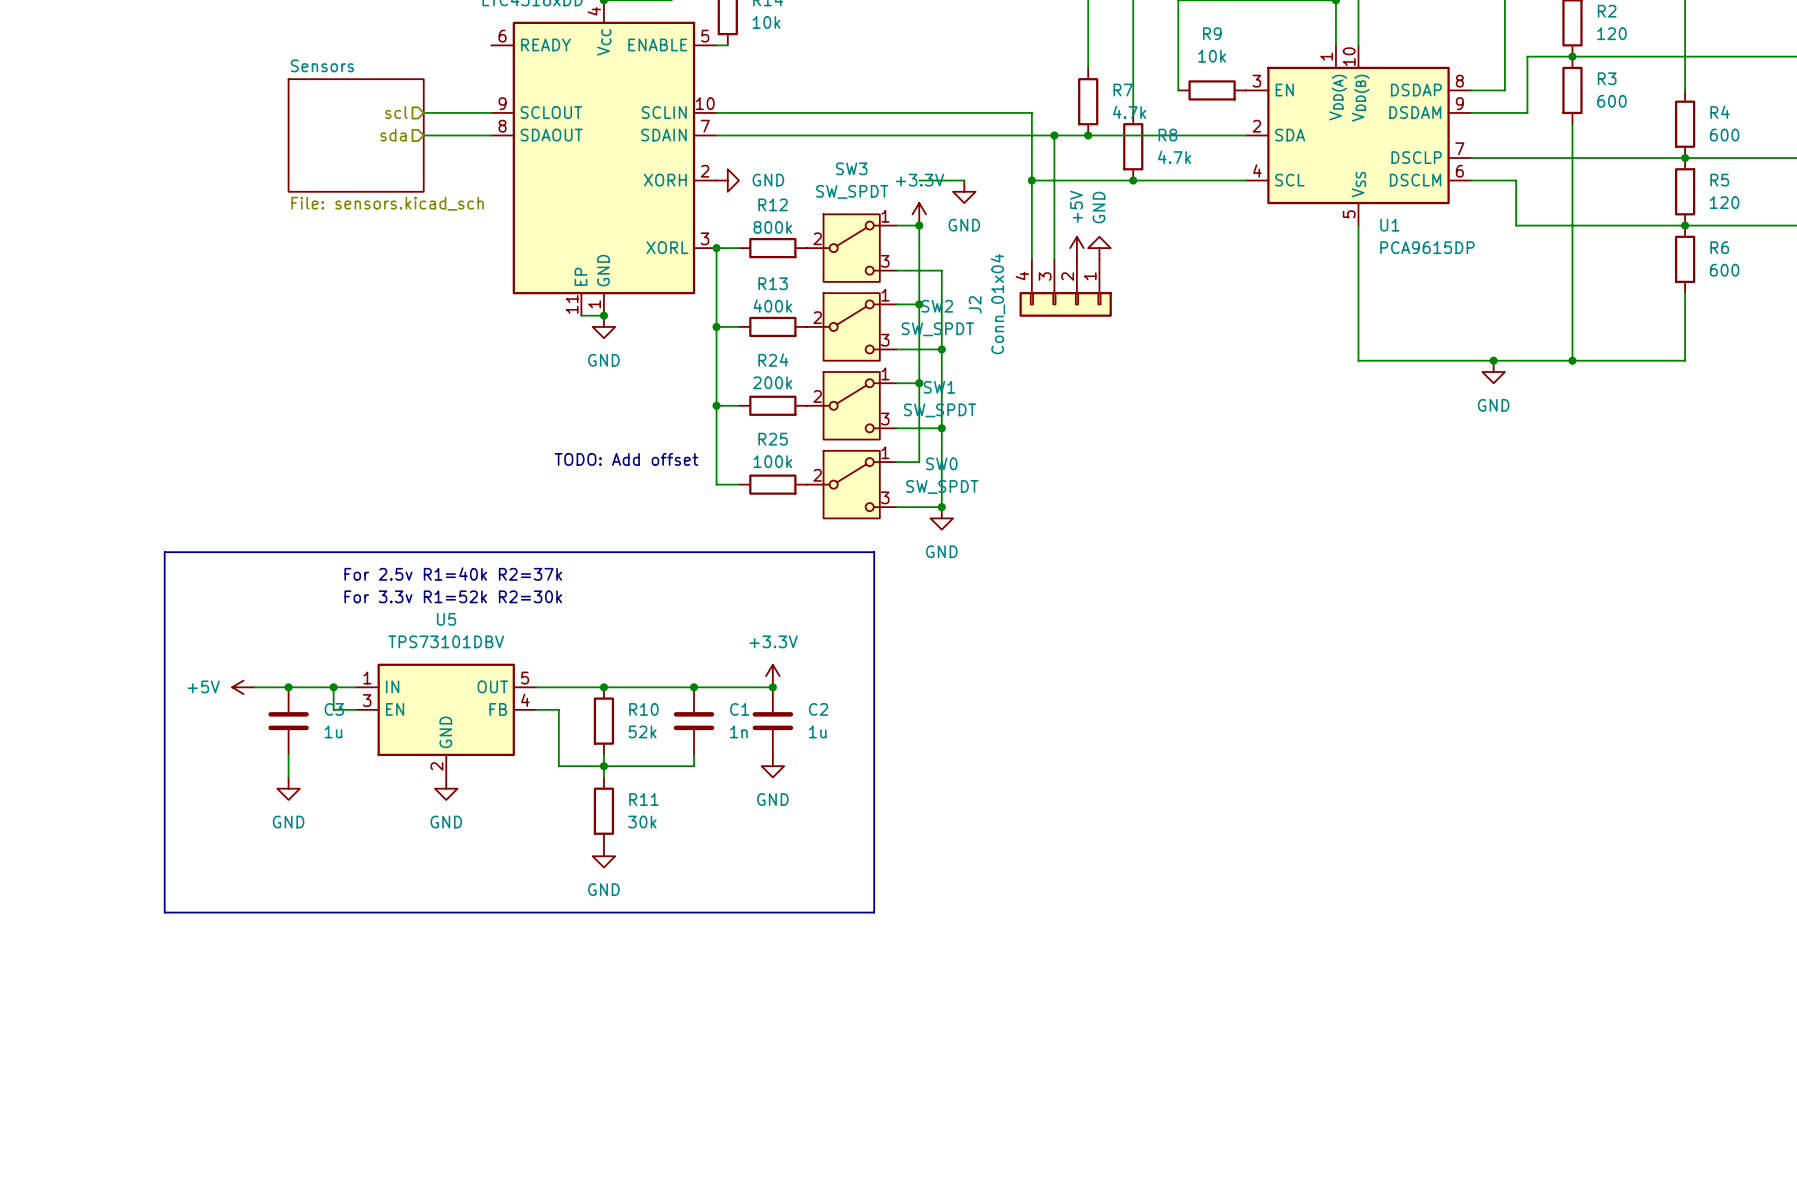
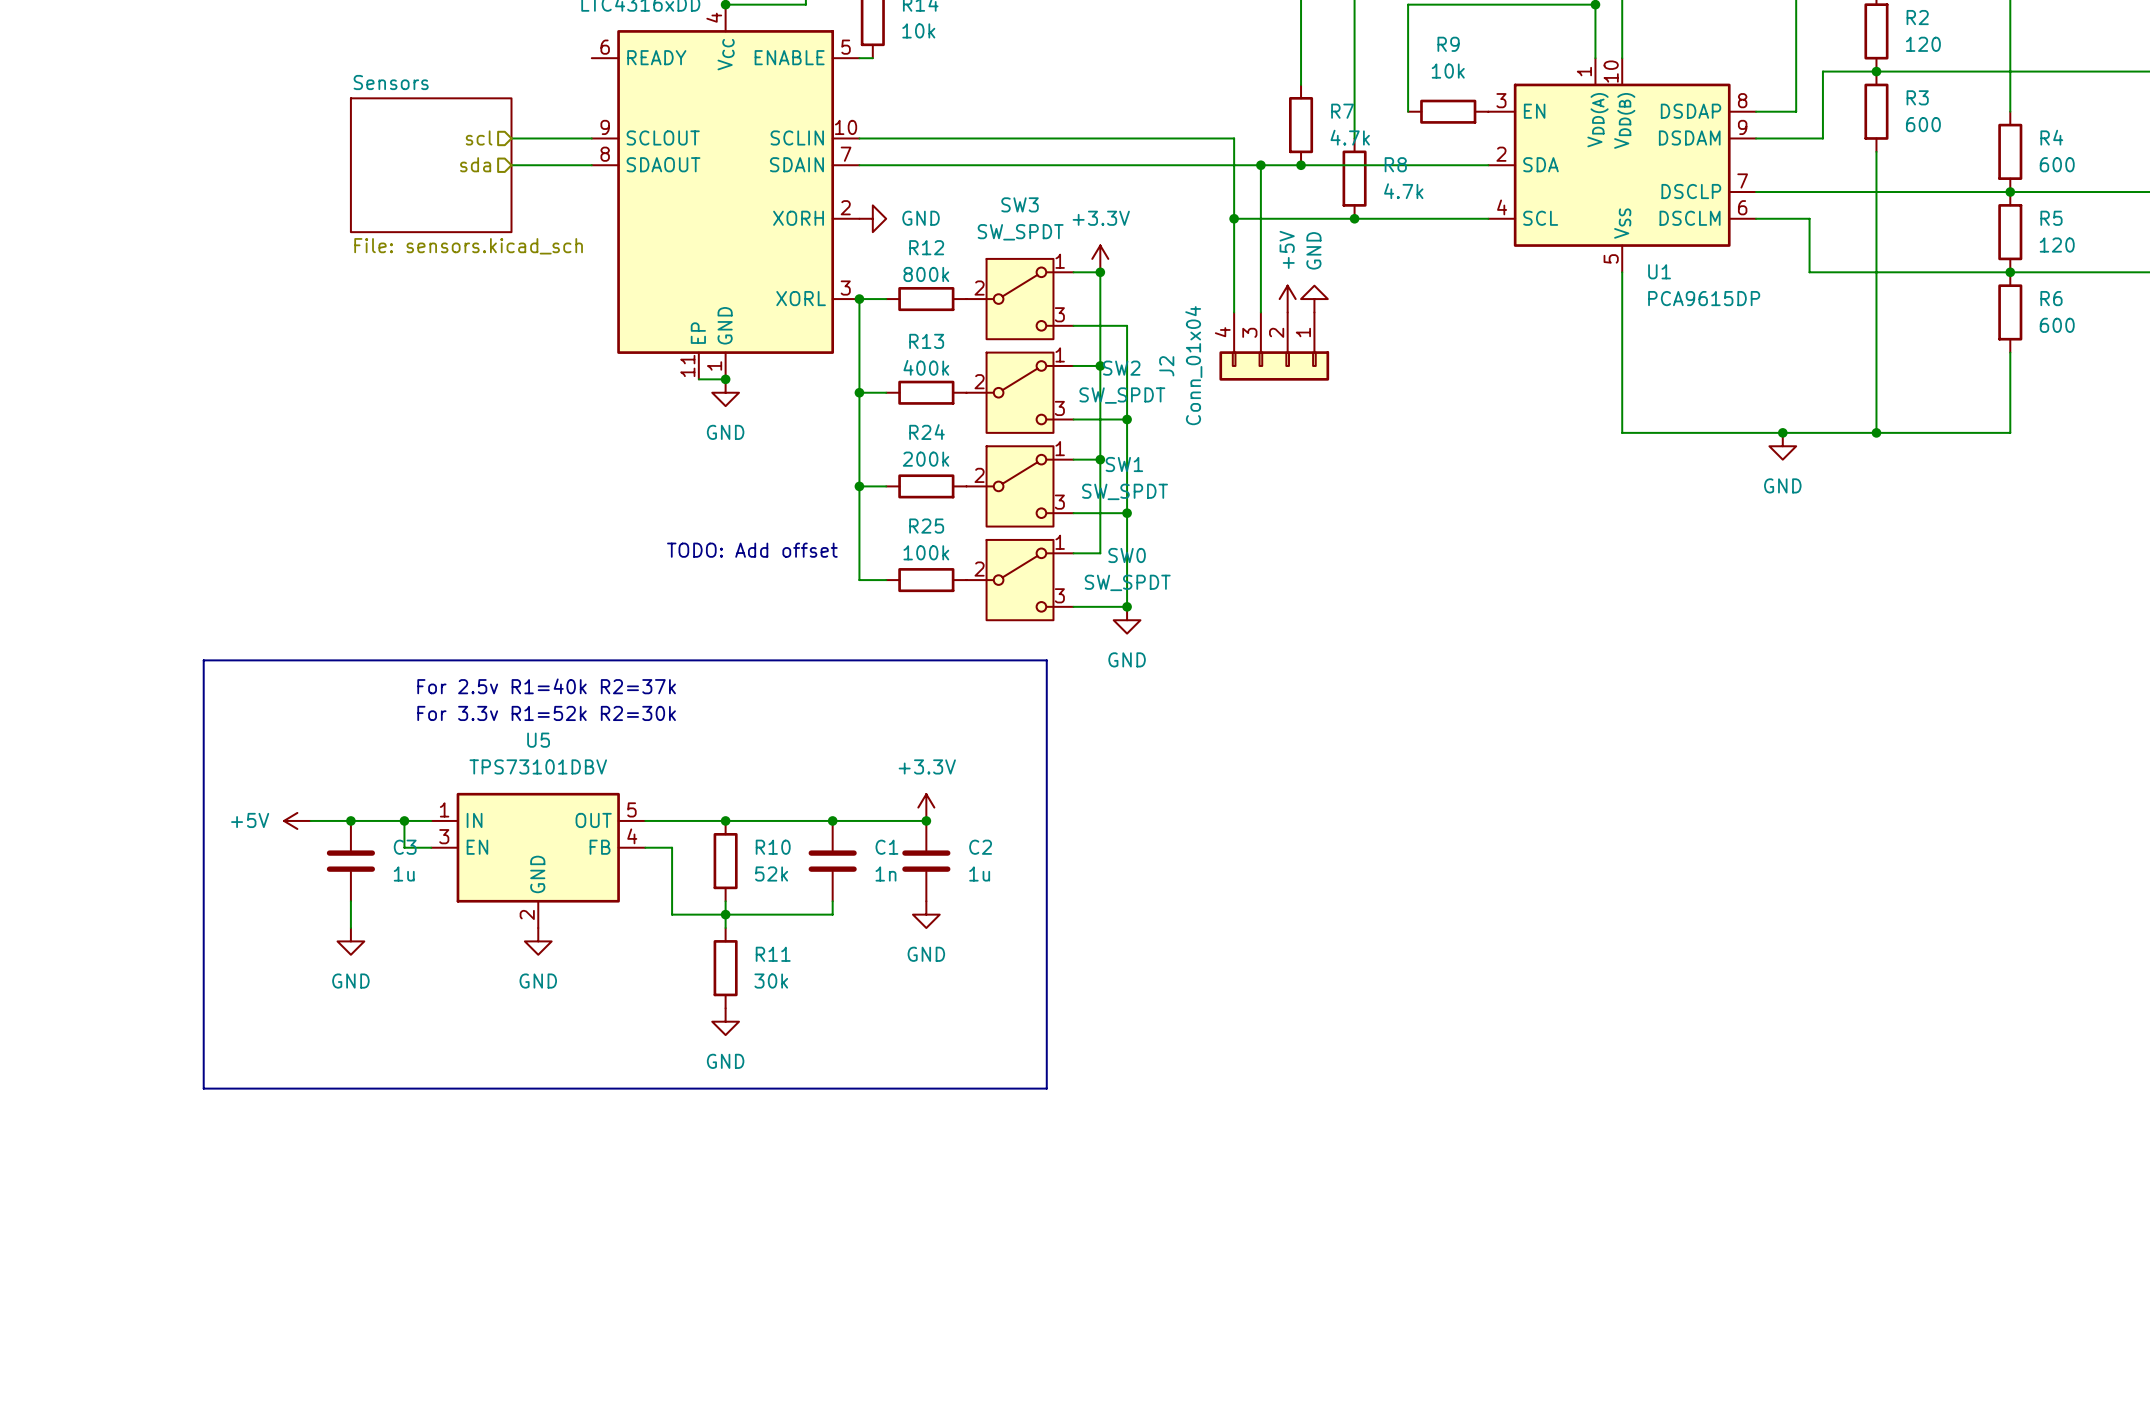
wire: (919, 180) (964, 180) -> none
power symbol: GND (964, 191) -> none

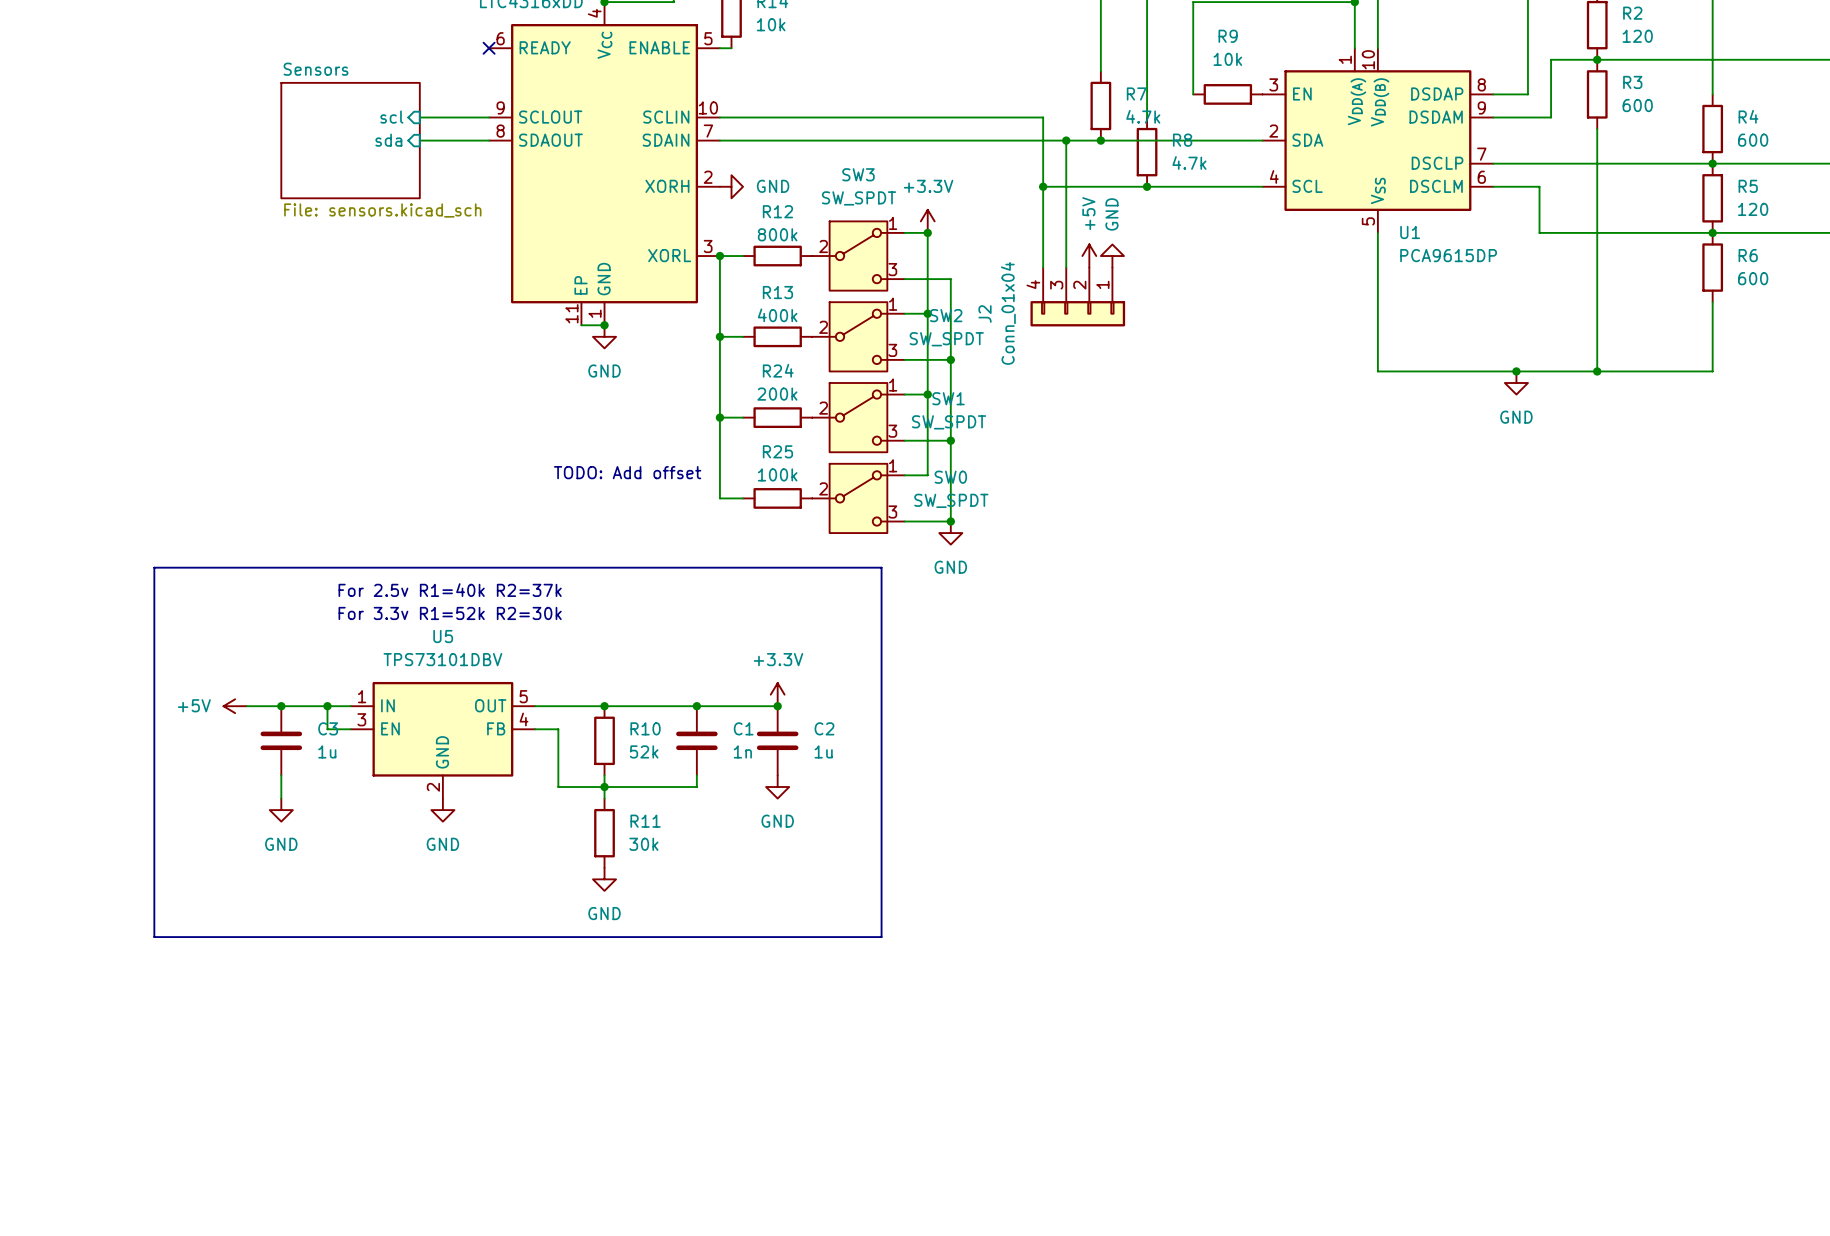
no-connect mark: none -> (489, 48)
hierarchical label: scl (479, 137) -> none
sheet pin: none -> scl (391, 117)
hierarchical label: sda (475, 164) -> none
sheet pin: none -> sda (388, 140)

